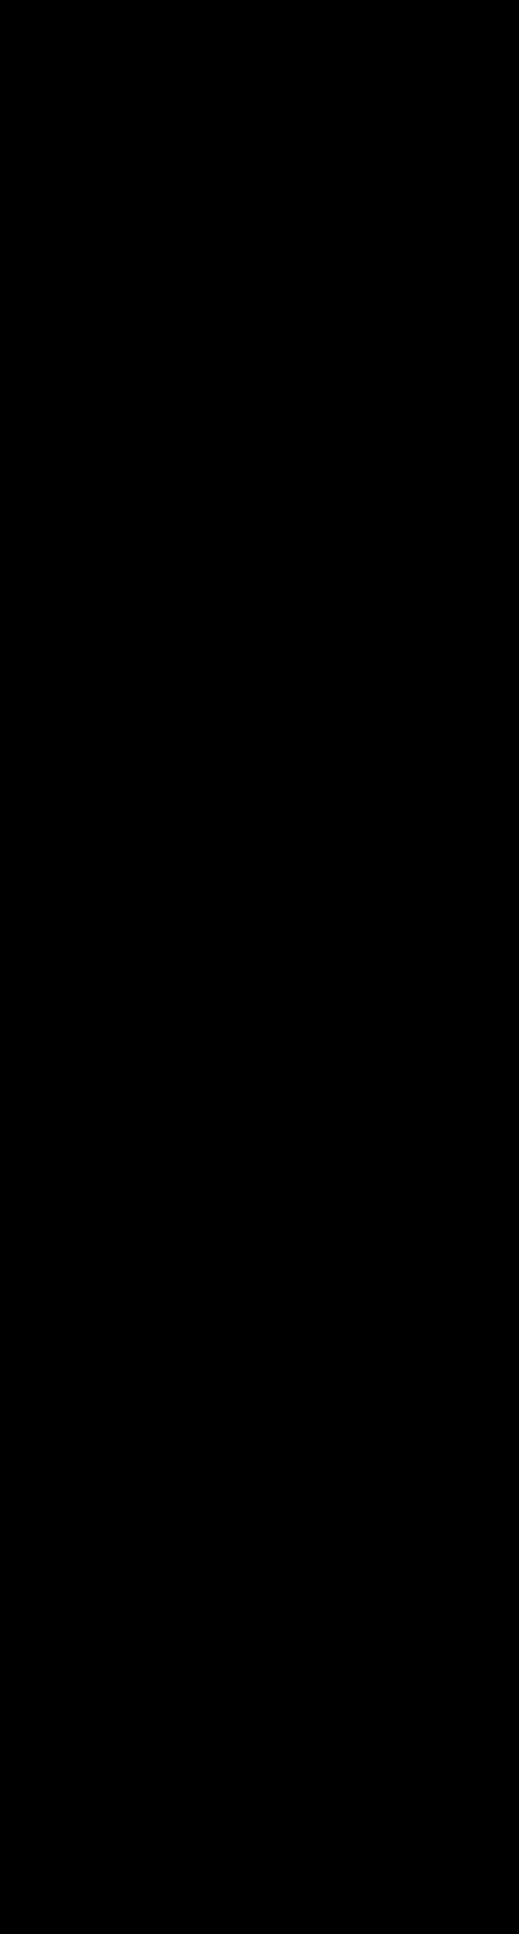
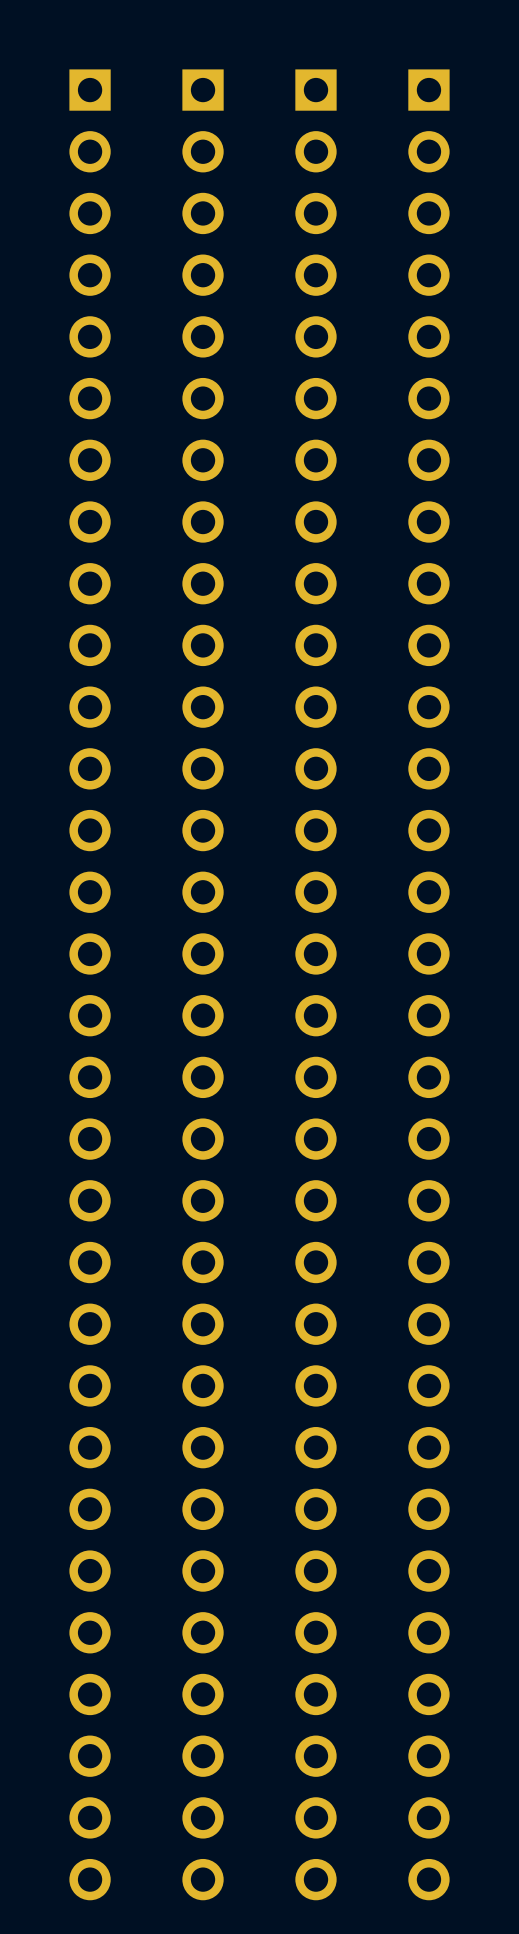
part: none -> (90, 984)
part: none -> (203, 984)
part: none -> (315, 984)
part: none -> (428, 984)

